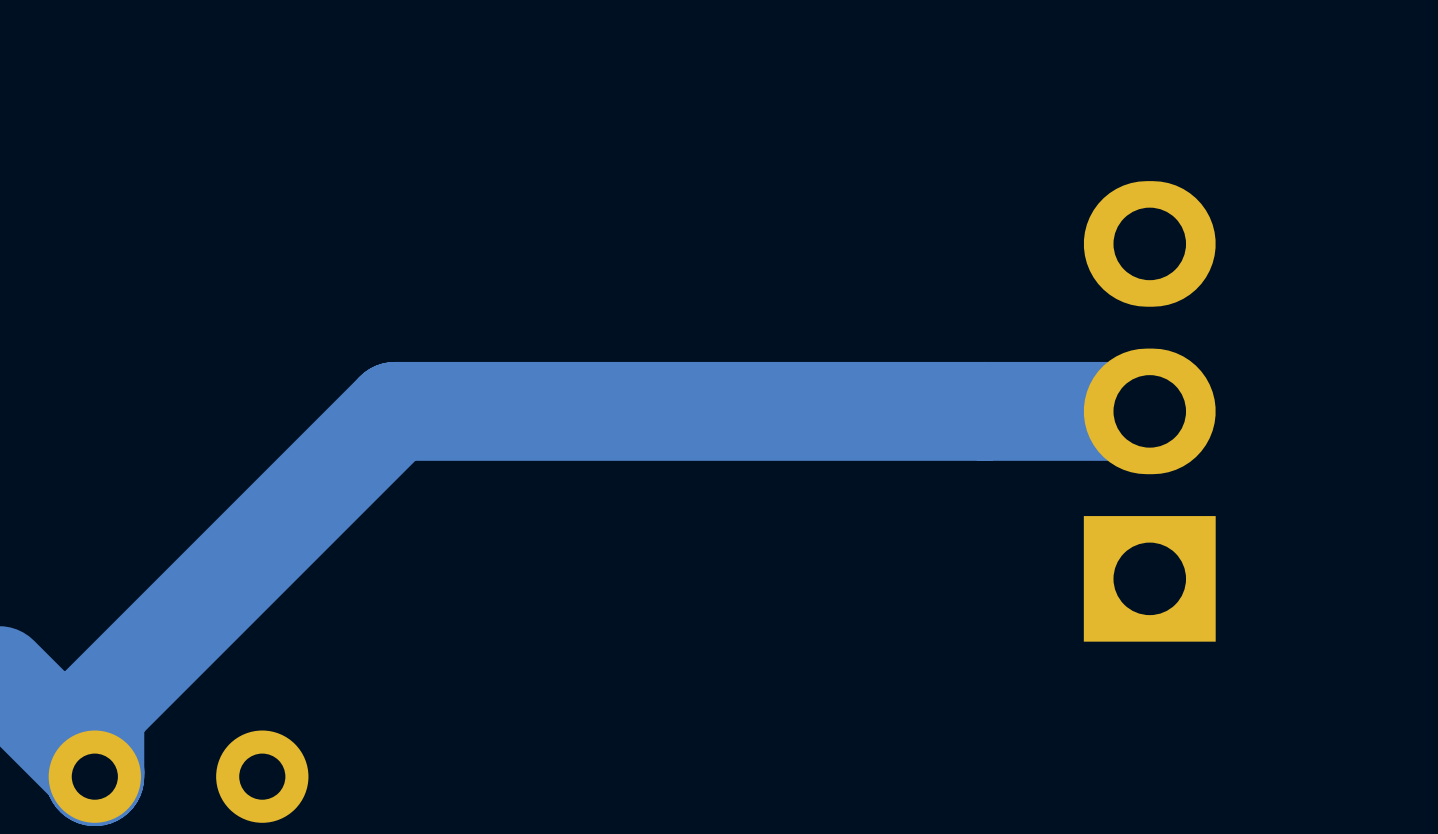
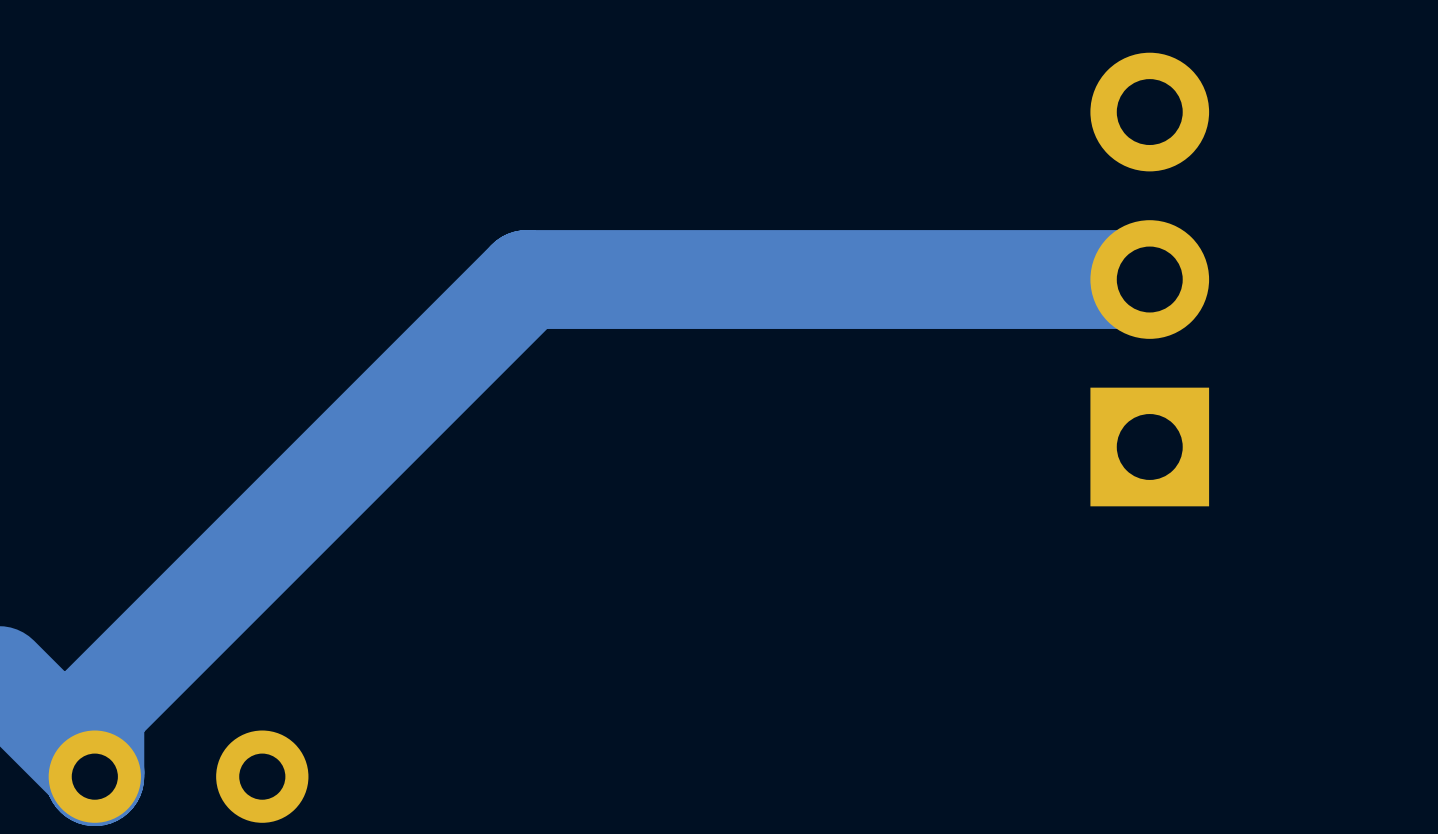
part: none -> (1149, 279)
track: (1149, 411) (394, 411) -> (1149, 279) (526, 279) (394, 411)
part: (1149, 411) -> none

